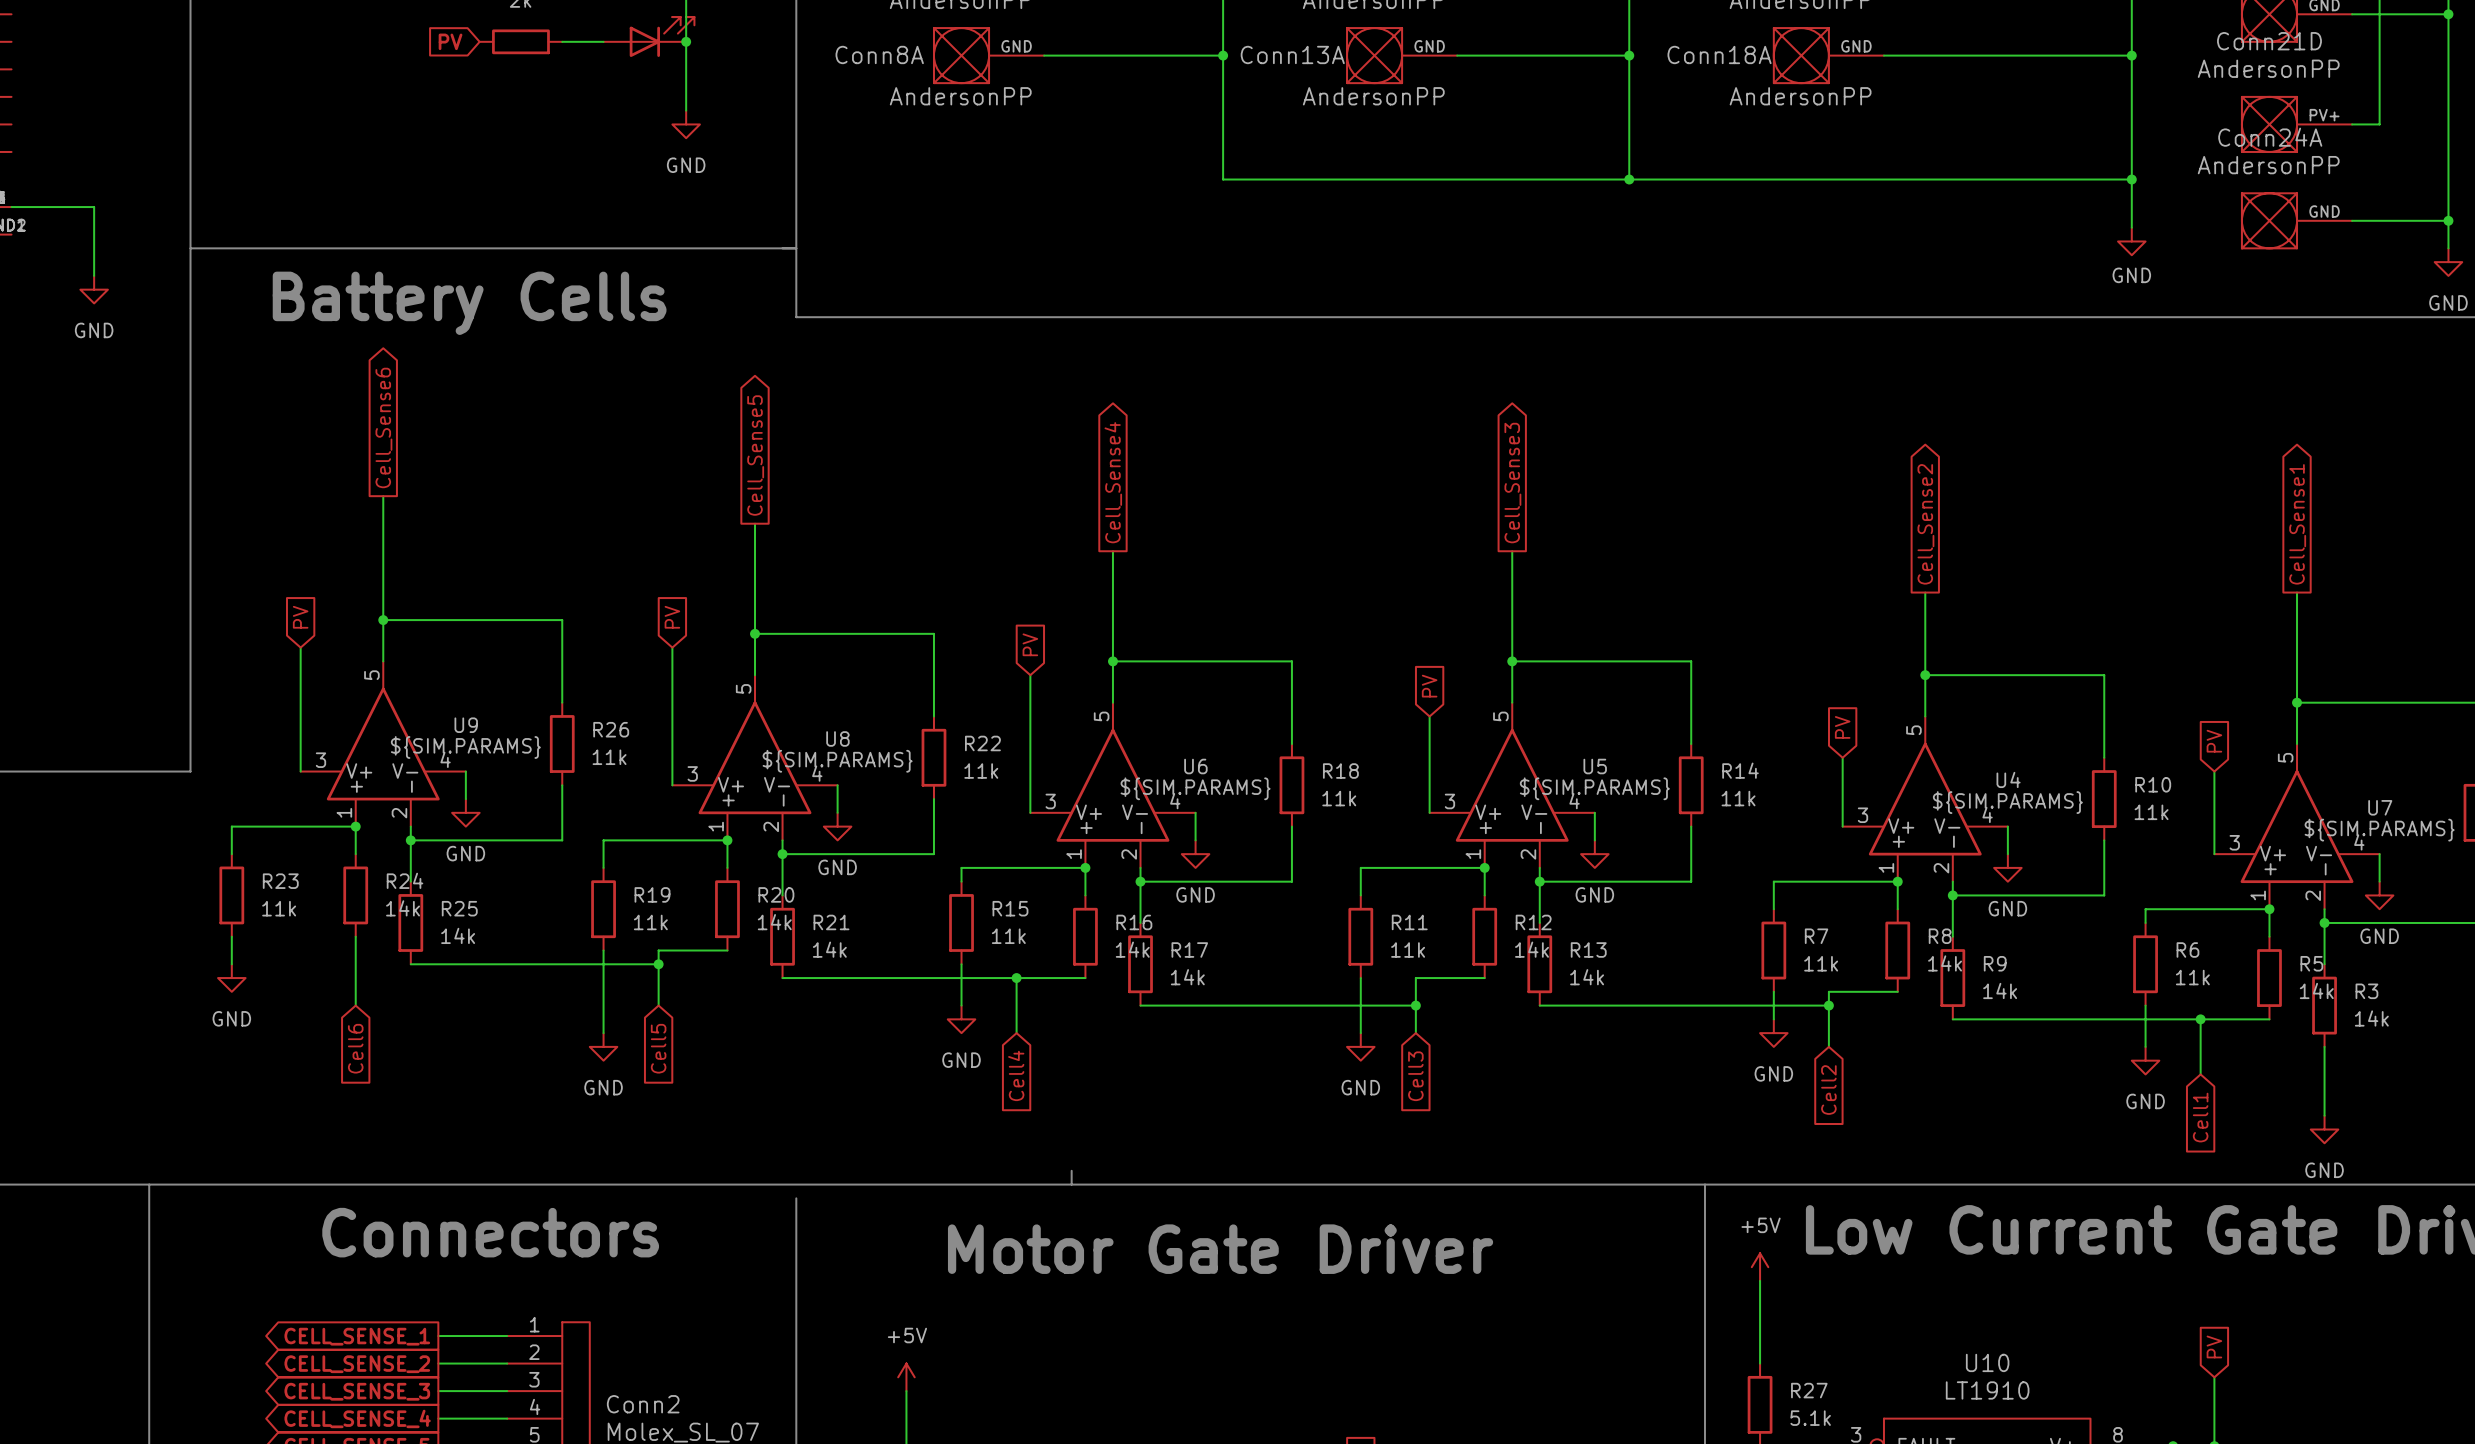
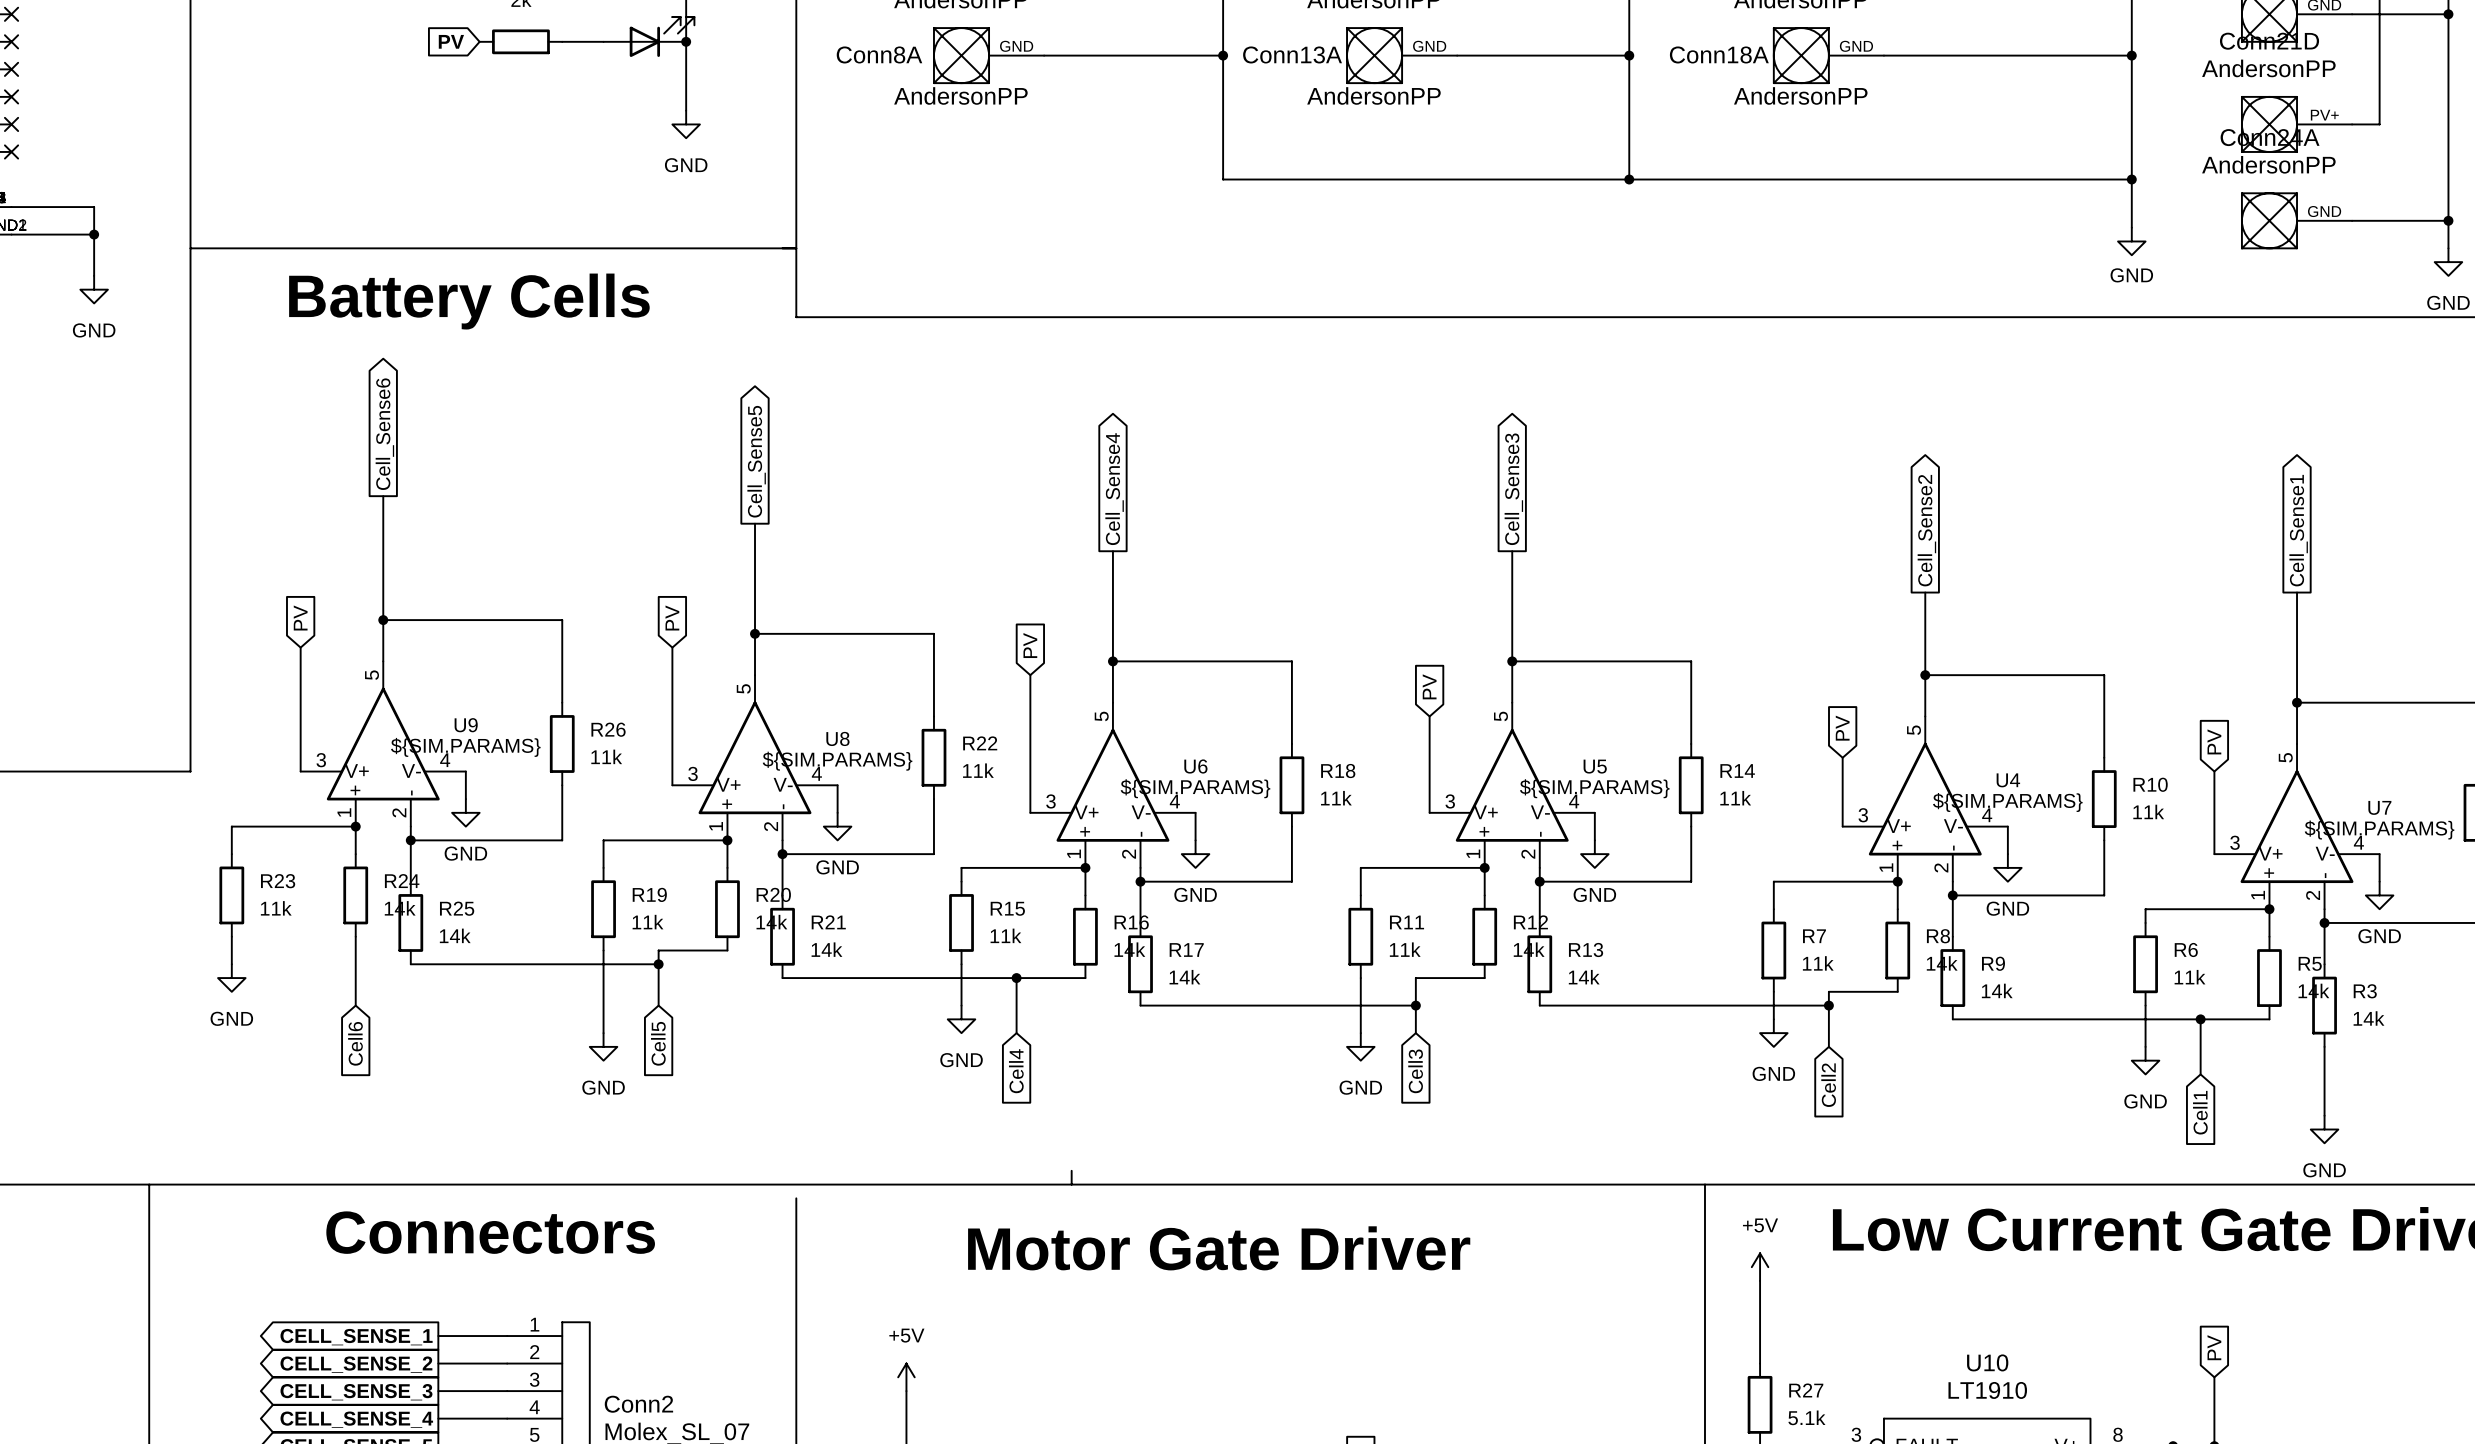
no-connect mark: none -> (11, 14)
no-connect mark: none -> (11, 41)
no-connect mark: none -> (11, 69)
no-connect mark: none -> (11, 96)
no-connect mark: none -> (11, 124)
no-connect mark: none -> (11, 151)
wire: none -> (11, 234) (94, 234)
junction: none -> (94, 234)

